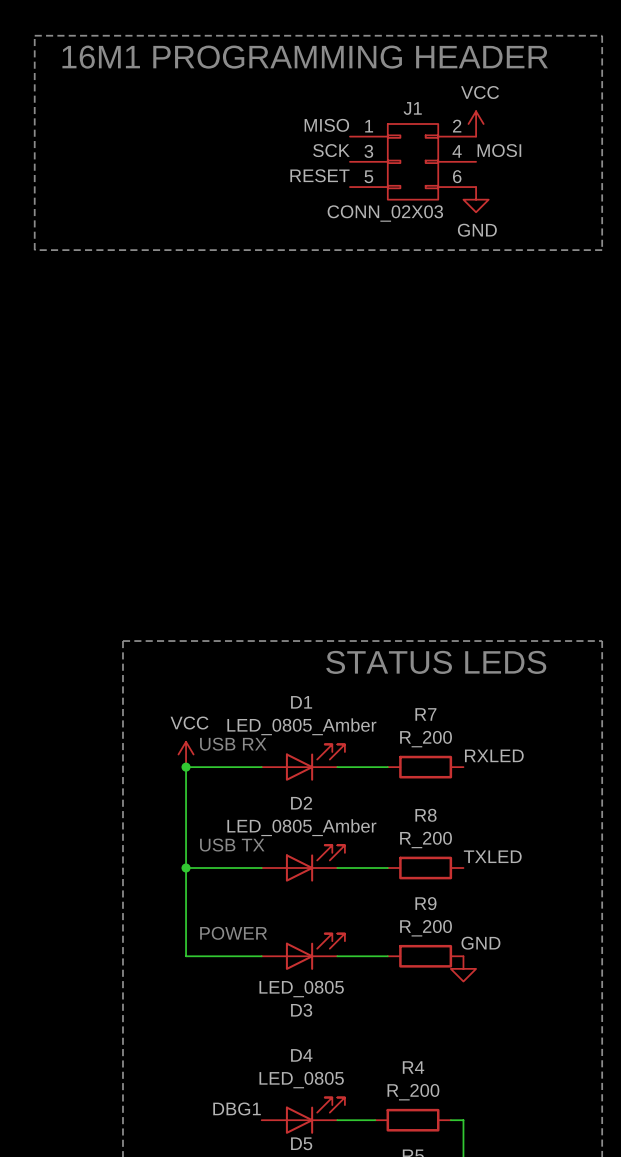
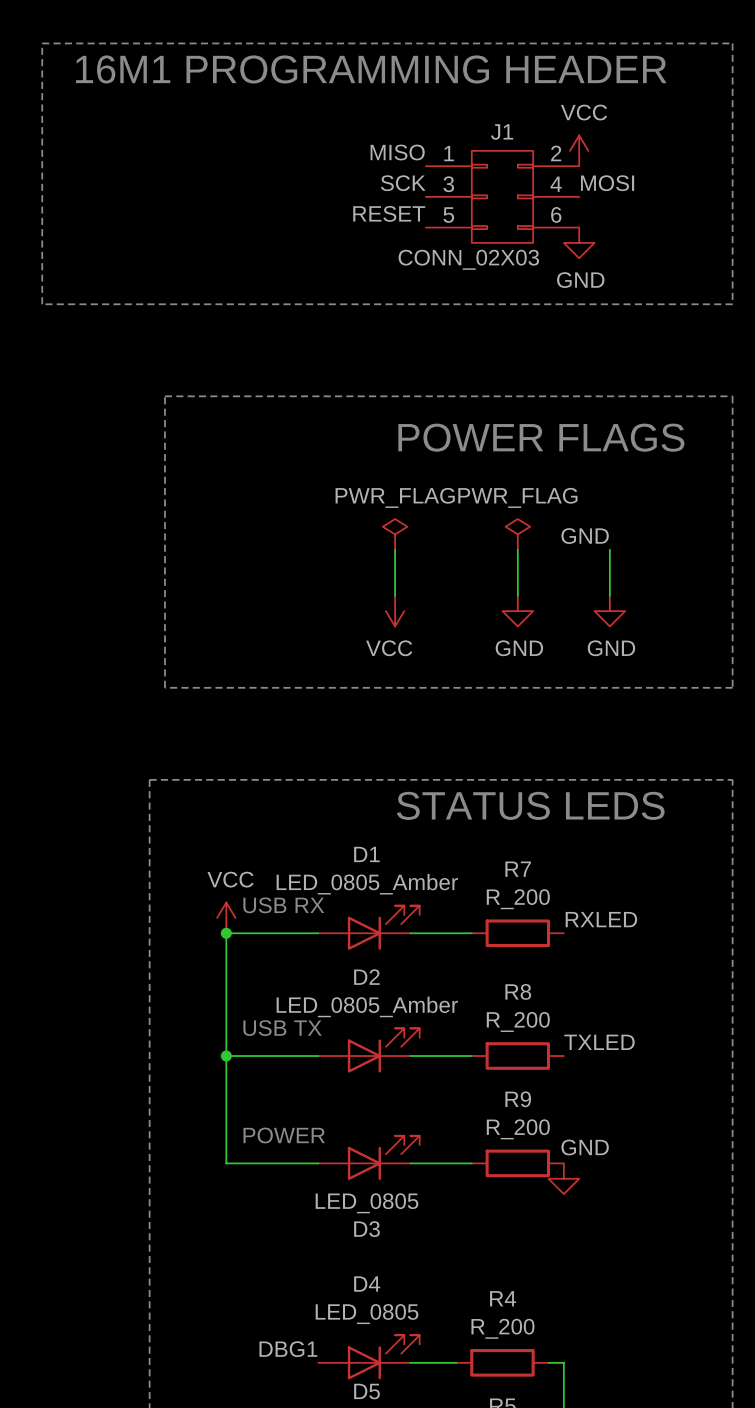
line: none -> (164, 396) (164, 687) (732, 687) (732, 396) (164, 396)
text: none -> POWER FLAGS (541, 437)
power symbol: none -> PWR_FLAG (395, 534)
power symbol: none -> PWR_FLAG (517, 534)
label: none -> GND (585, 536)
wire: none -> (395, 549) (395, 595)
wire: none -> (517, 549) (517, 595)
wire: none -> (609, 549) (609, 595)
power symbol: none -> VCC (395, 611)
power symbol: none -> GND (517, 611)
power symbol: none -> GND (609, 611)

